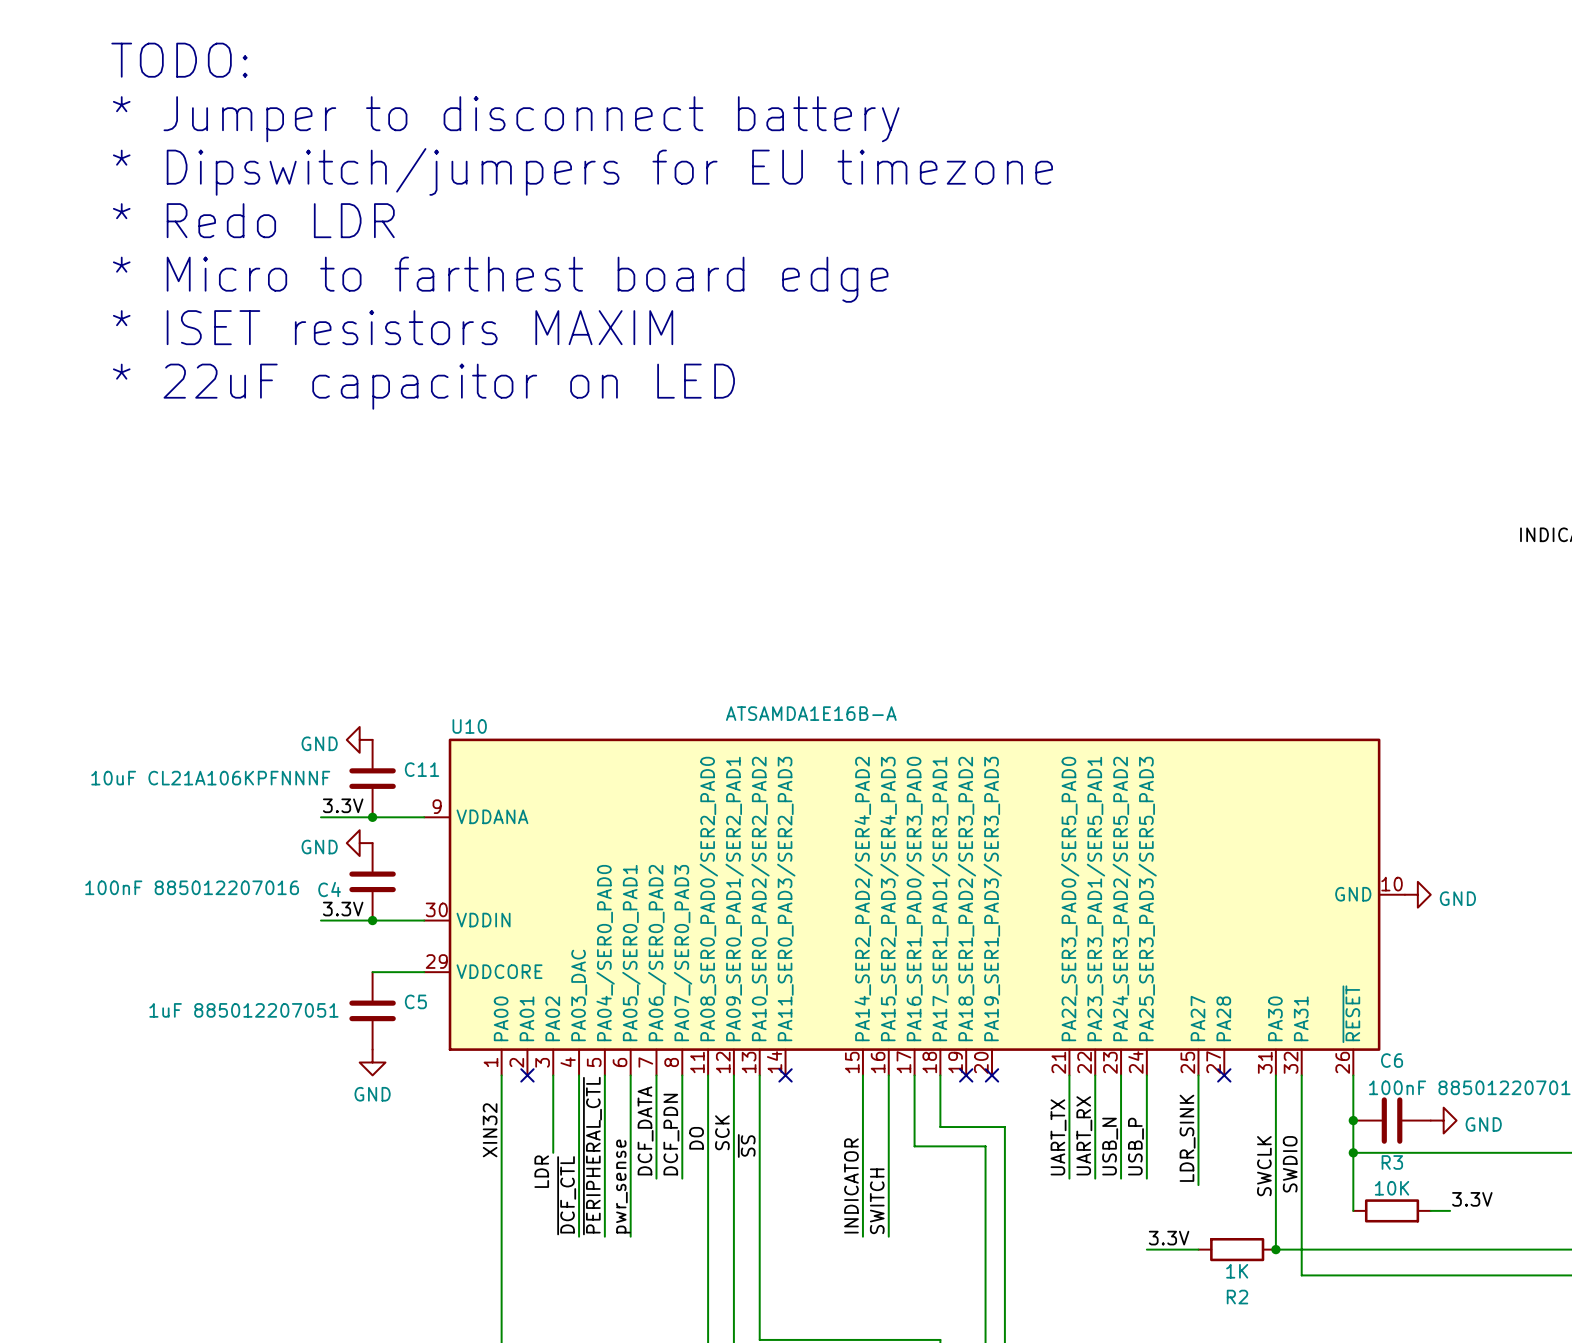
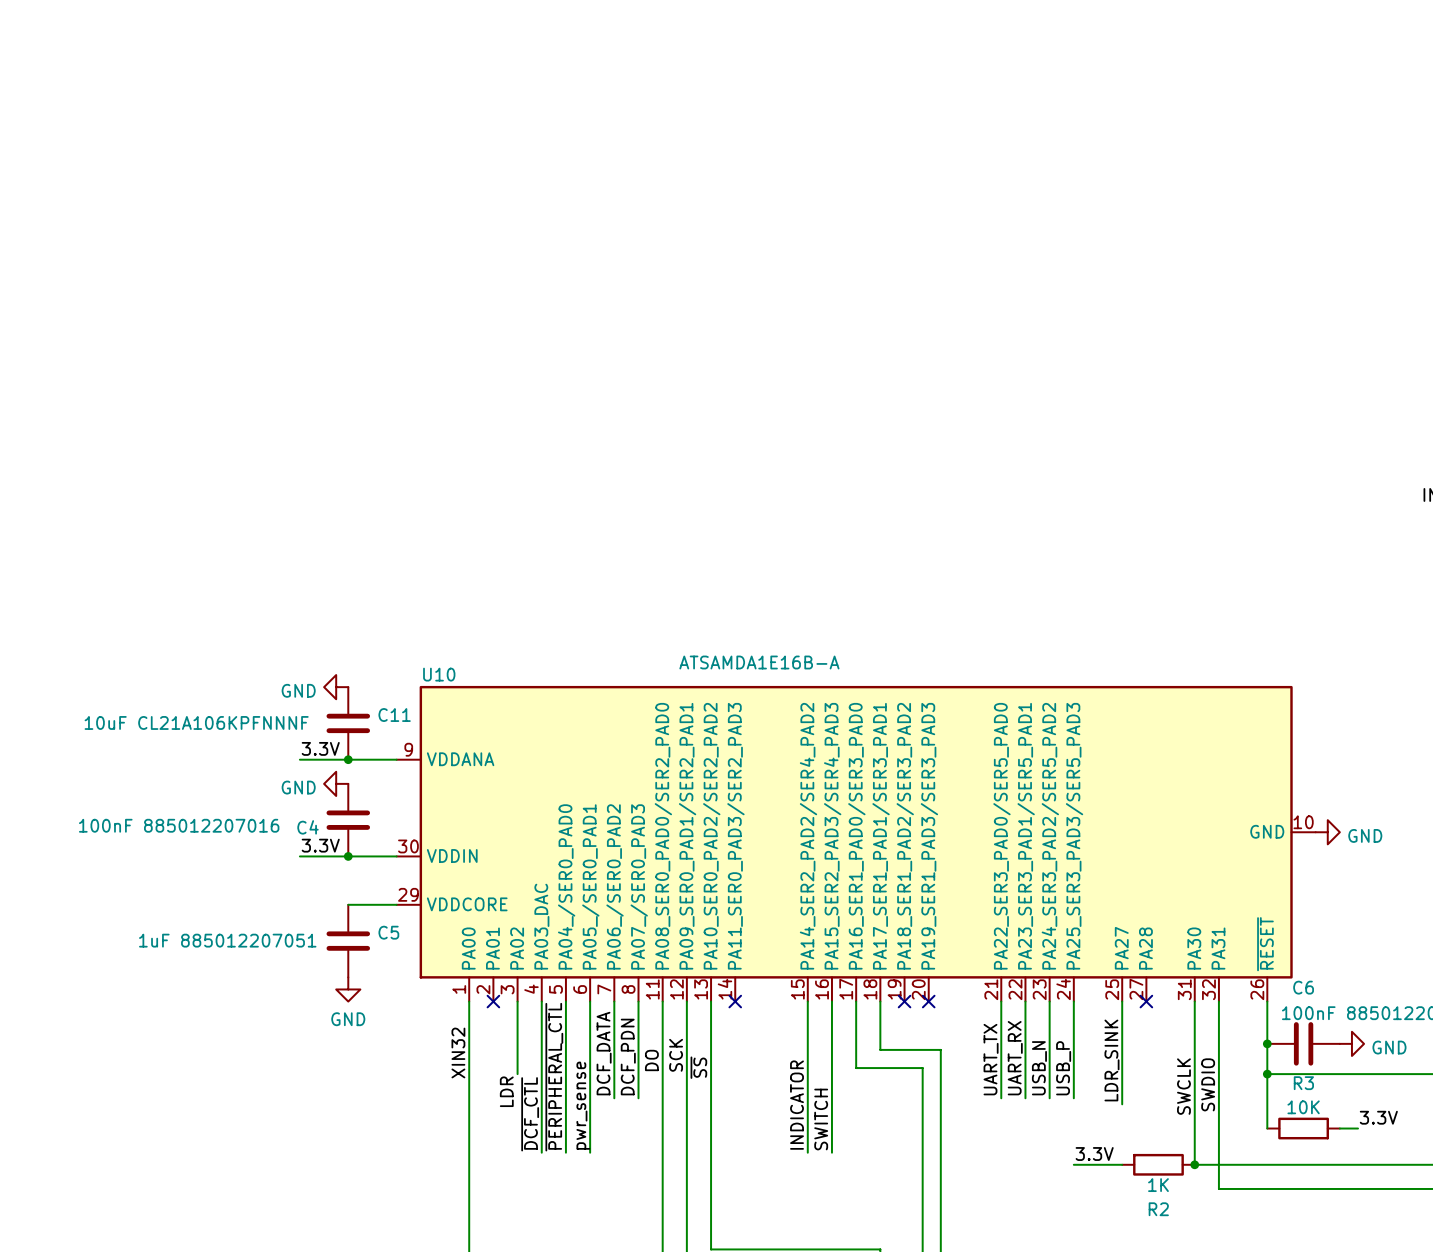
text: TODO: (179, 60) -> none
text: * Jumper to disconnect battery (506, 119) -> none
text: * Dipswitch/jumpers for EU timezone (582, 171) -> none
text: * Redo LDR (253, 220) -> none
text: * Micro to farthest board edge (500, 279) -> none
text: * ISET resistors MAXIM (393, 327) -> none
text: * 22uF capacitor on LED (423, 386) -> none

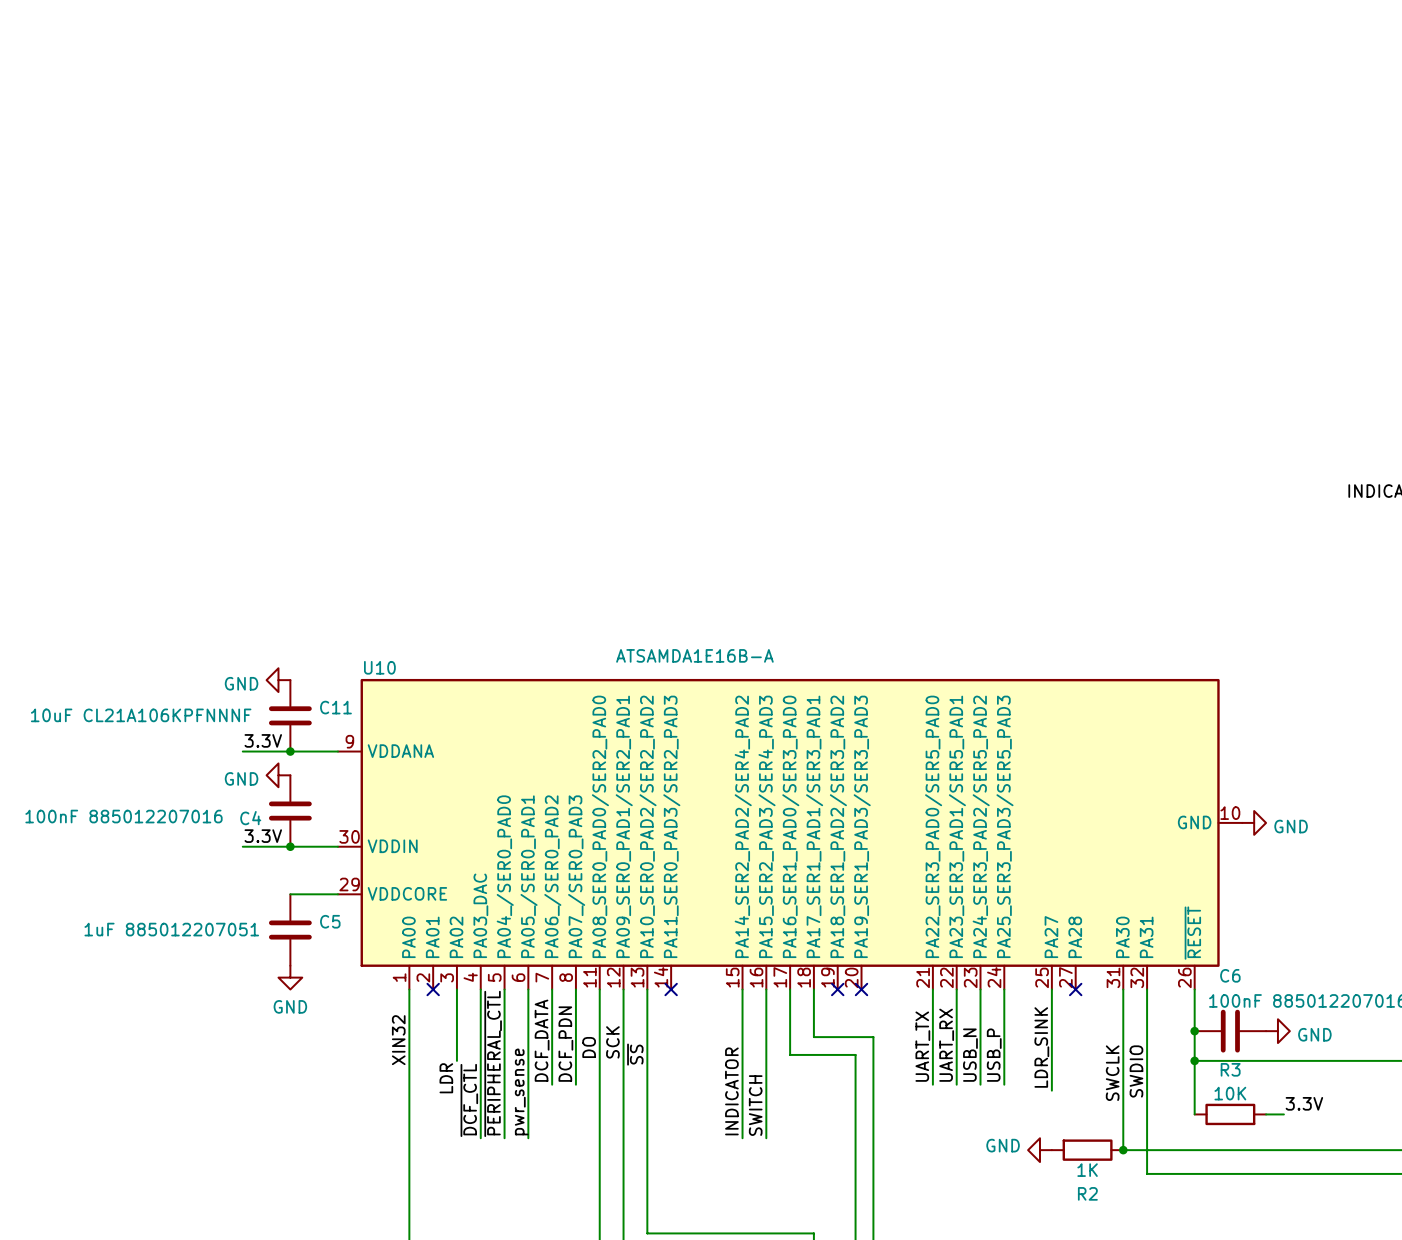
label: 3.3V (1094, 1154) -> none
wire: (1073, 1164) (1122, 1164) -> none
power symbol: none -> GND (1039, 1150)

